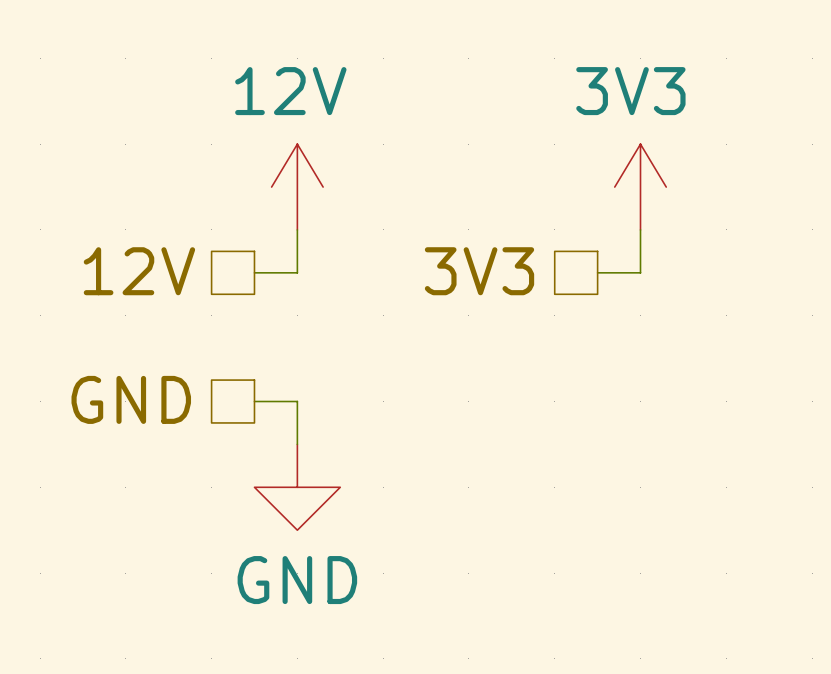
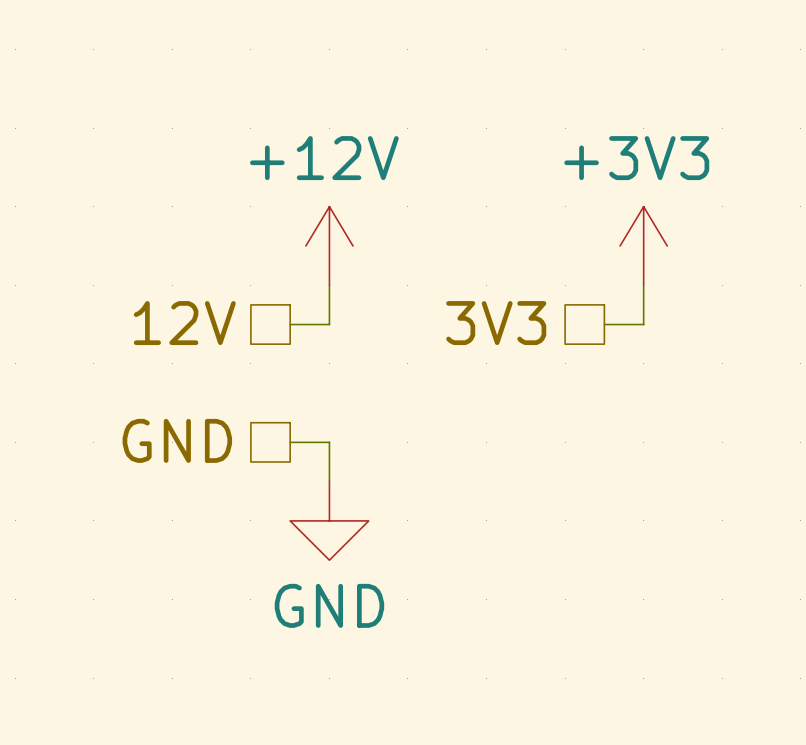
power symbol: 12V (297, 187) -> +12V (329, 245)
power symbol: 3V3 (640, 187) -> +3V3 (643, 245)

